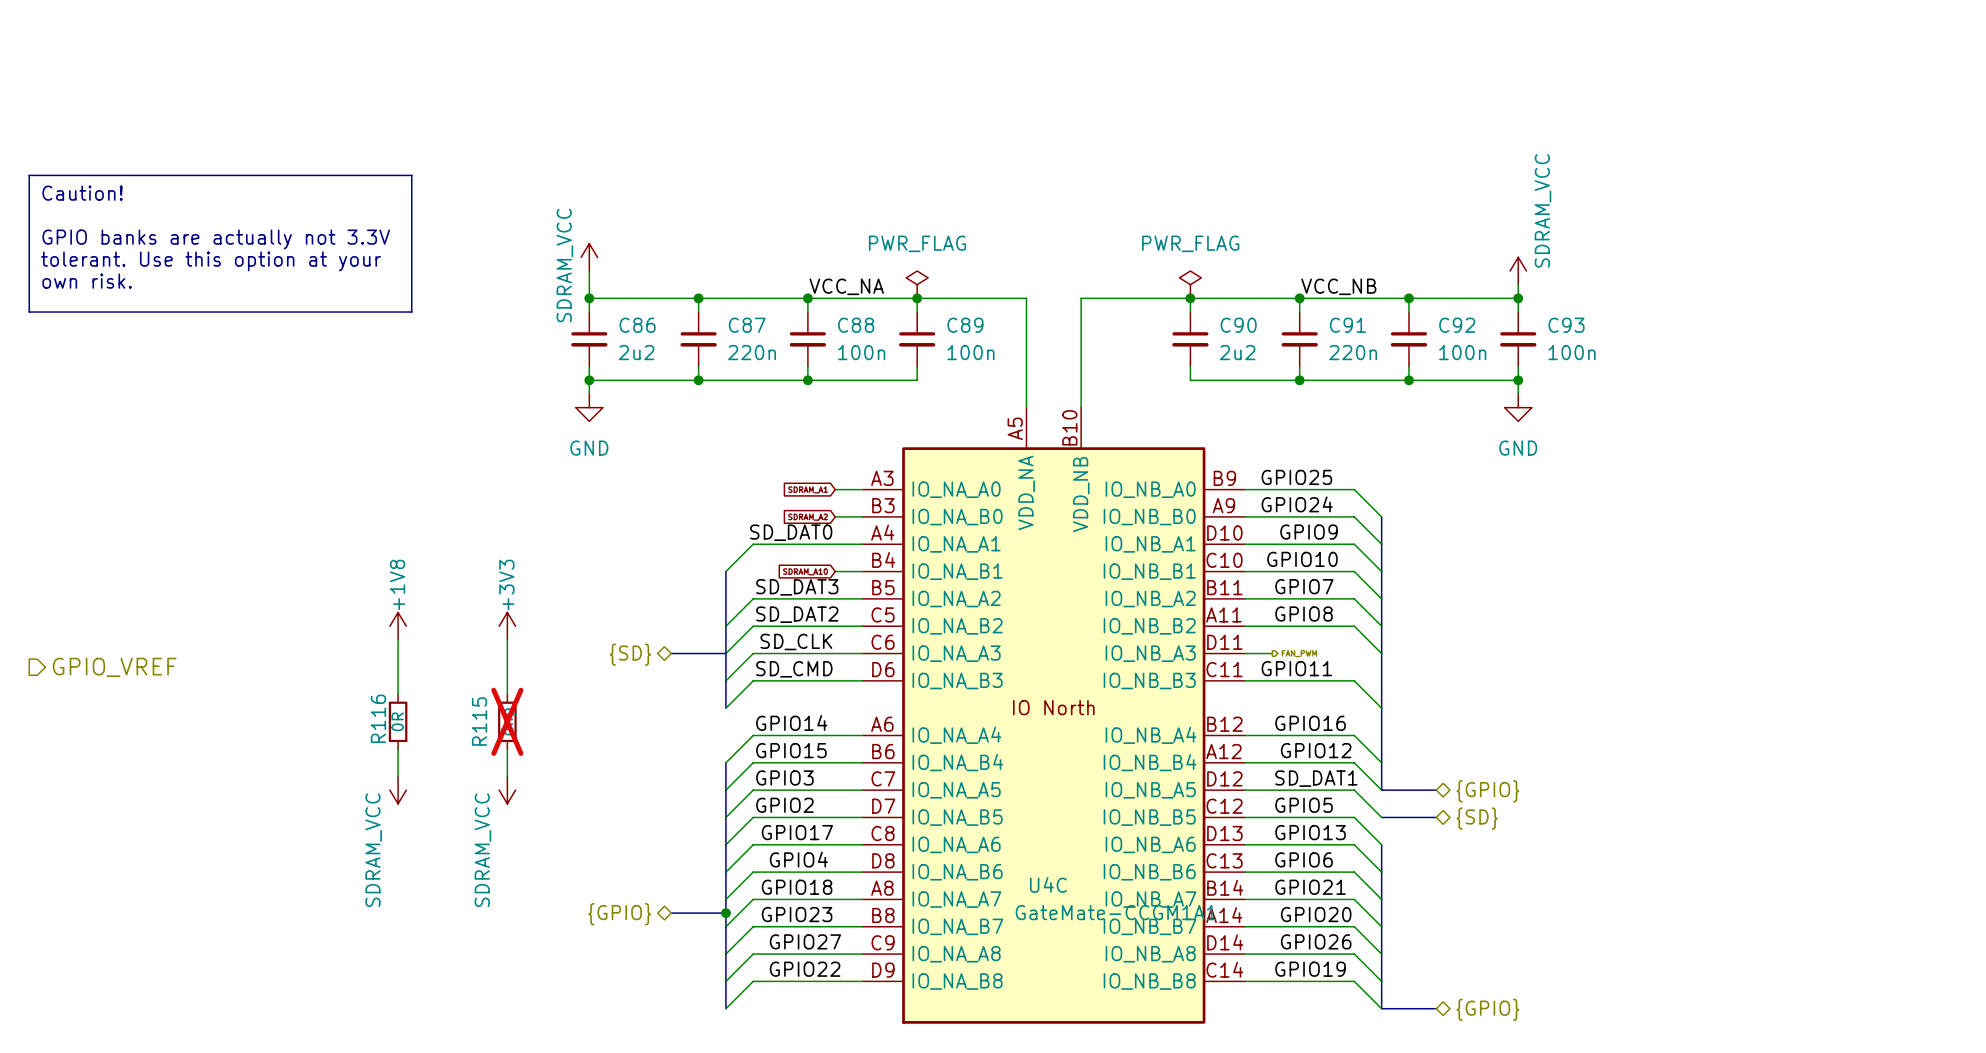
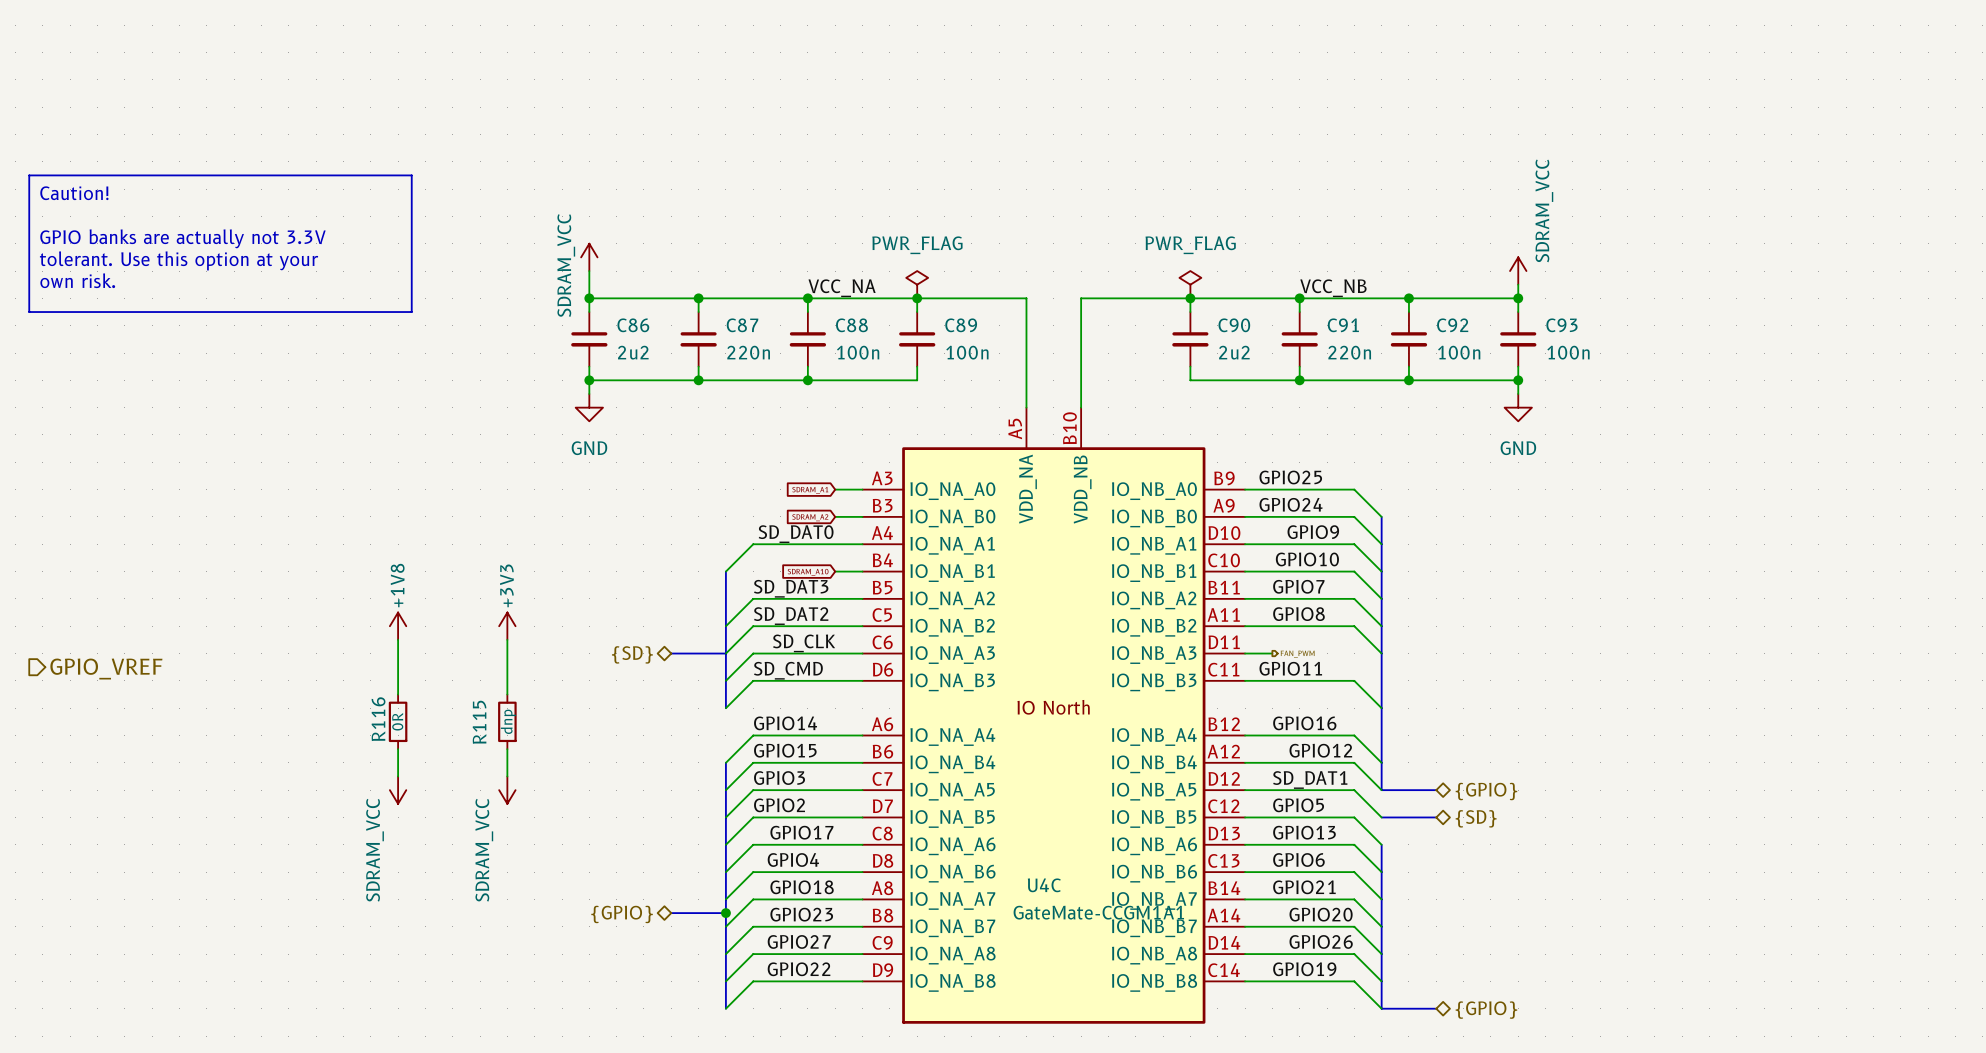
R115 do-not-place cross: (507, 721) -> none

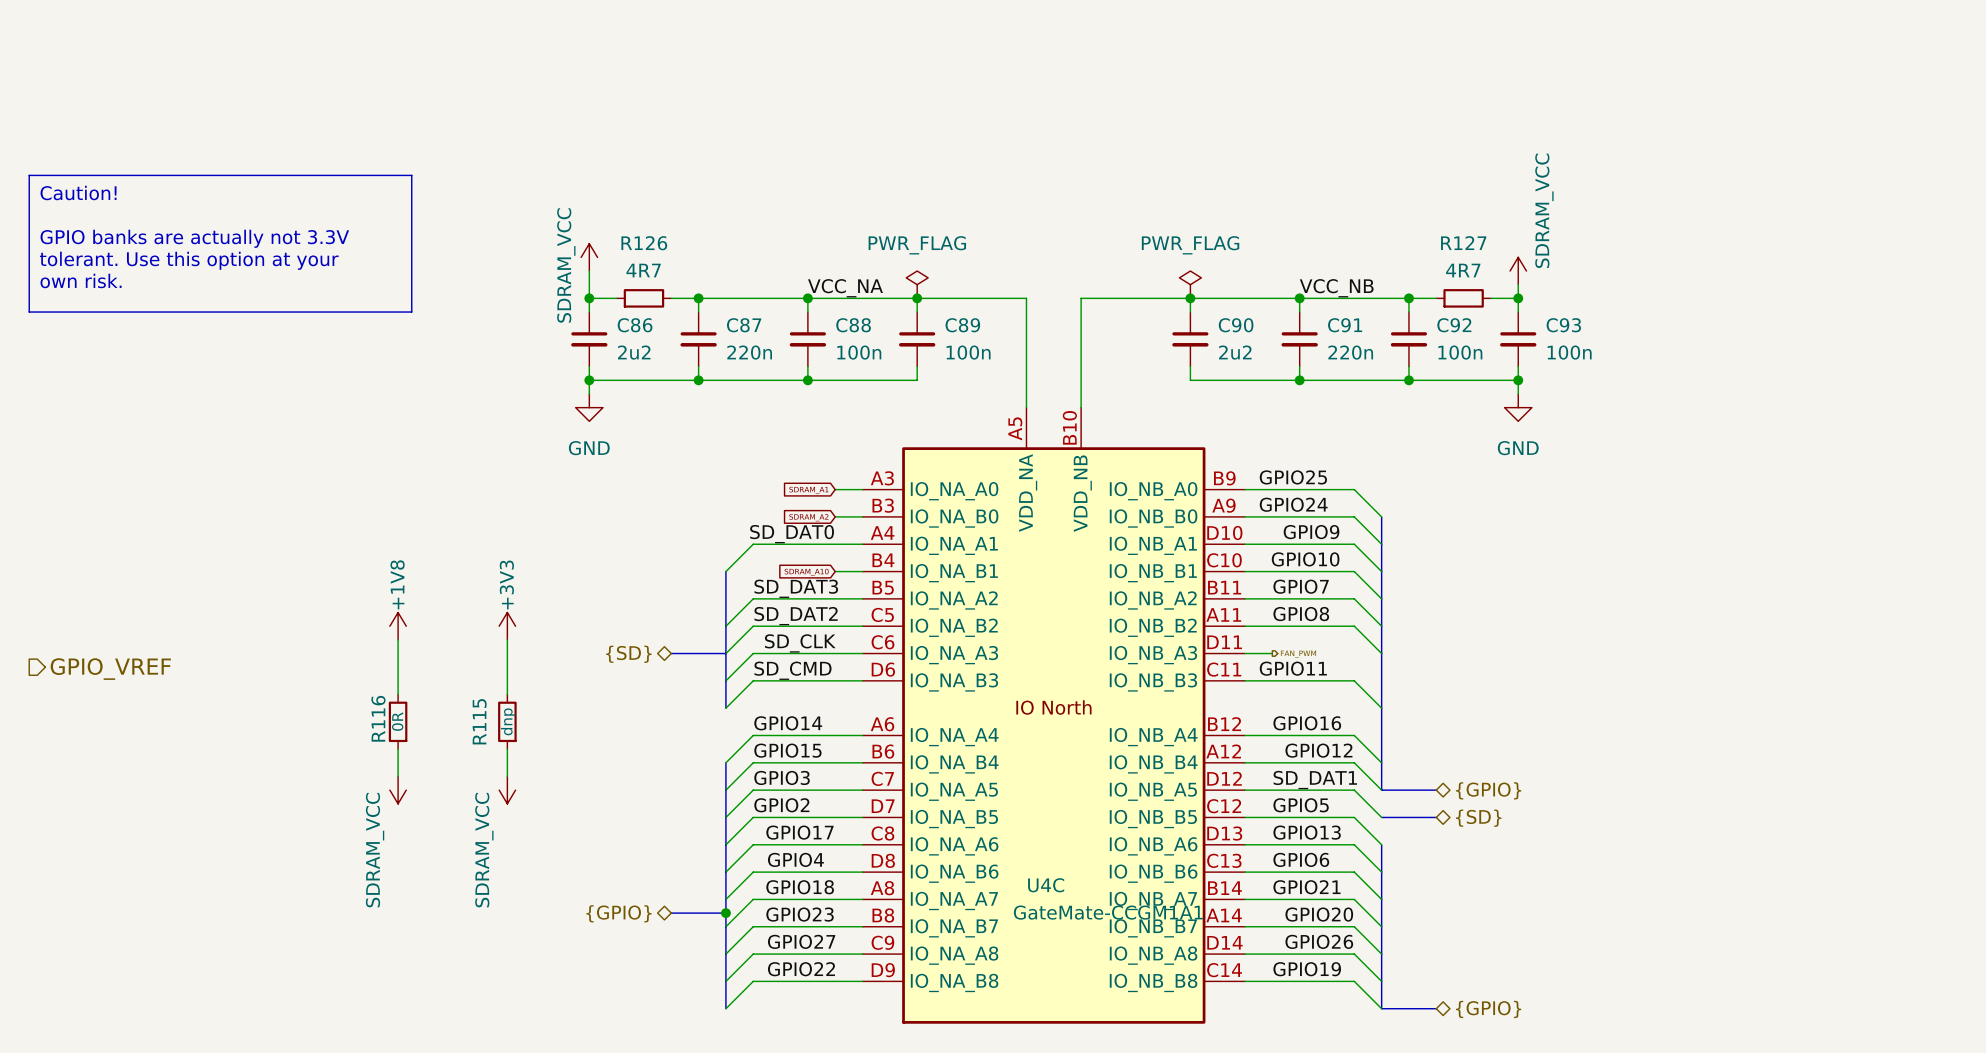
wire: (616, 298) (671, 298) -> none
R126: none -> 4R7 (643, 298)
wire: (1436, 298) (1490, 298) -> none
R127: none -> 4R7 (1463, 298)

